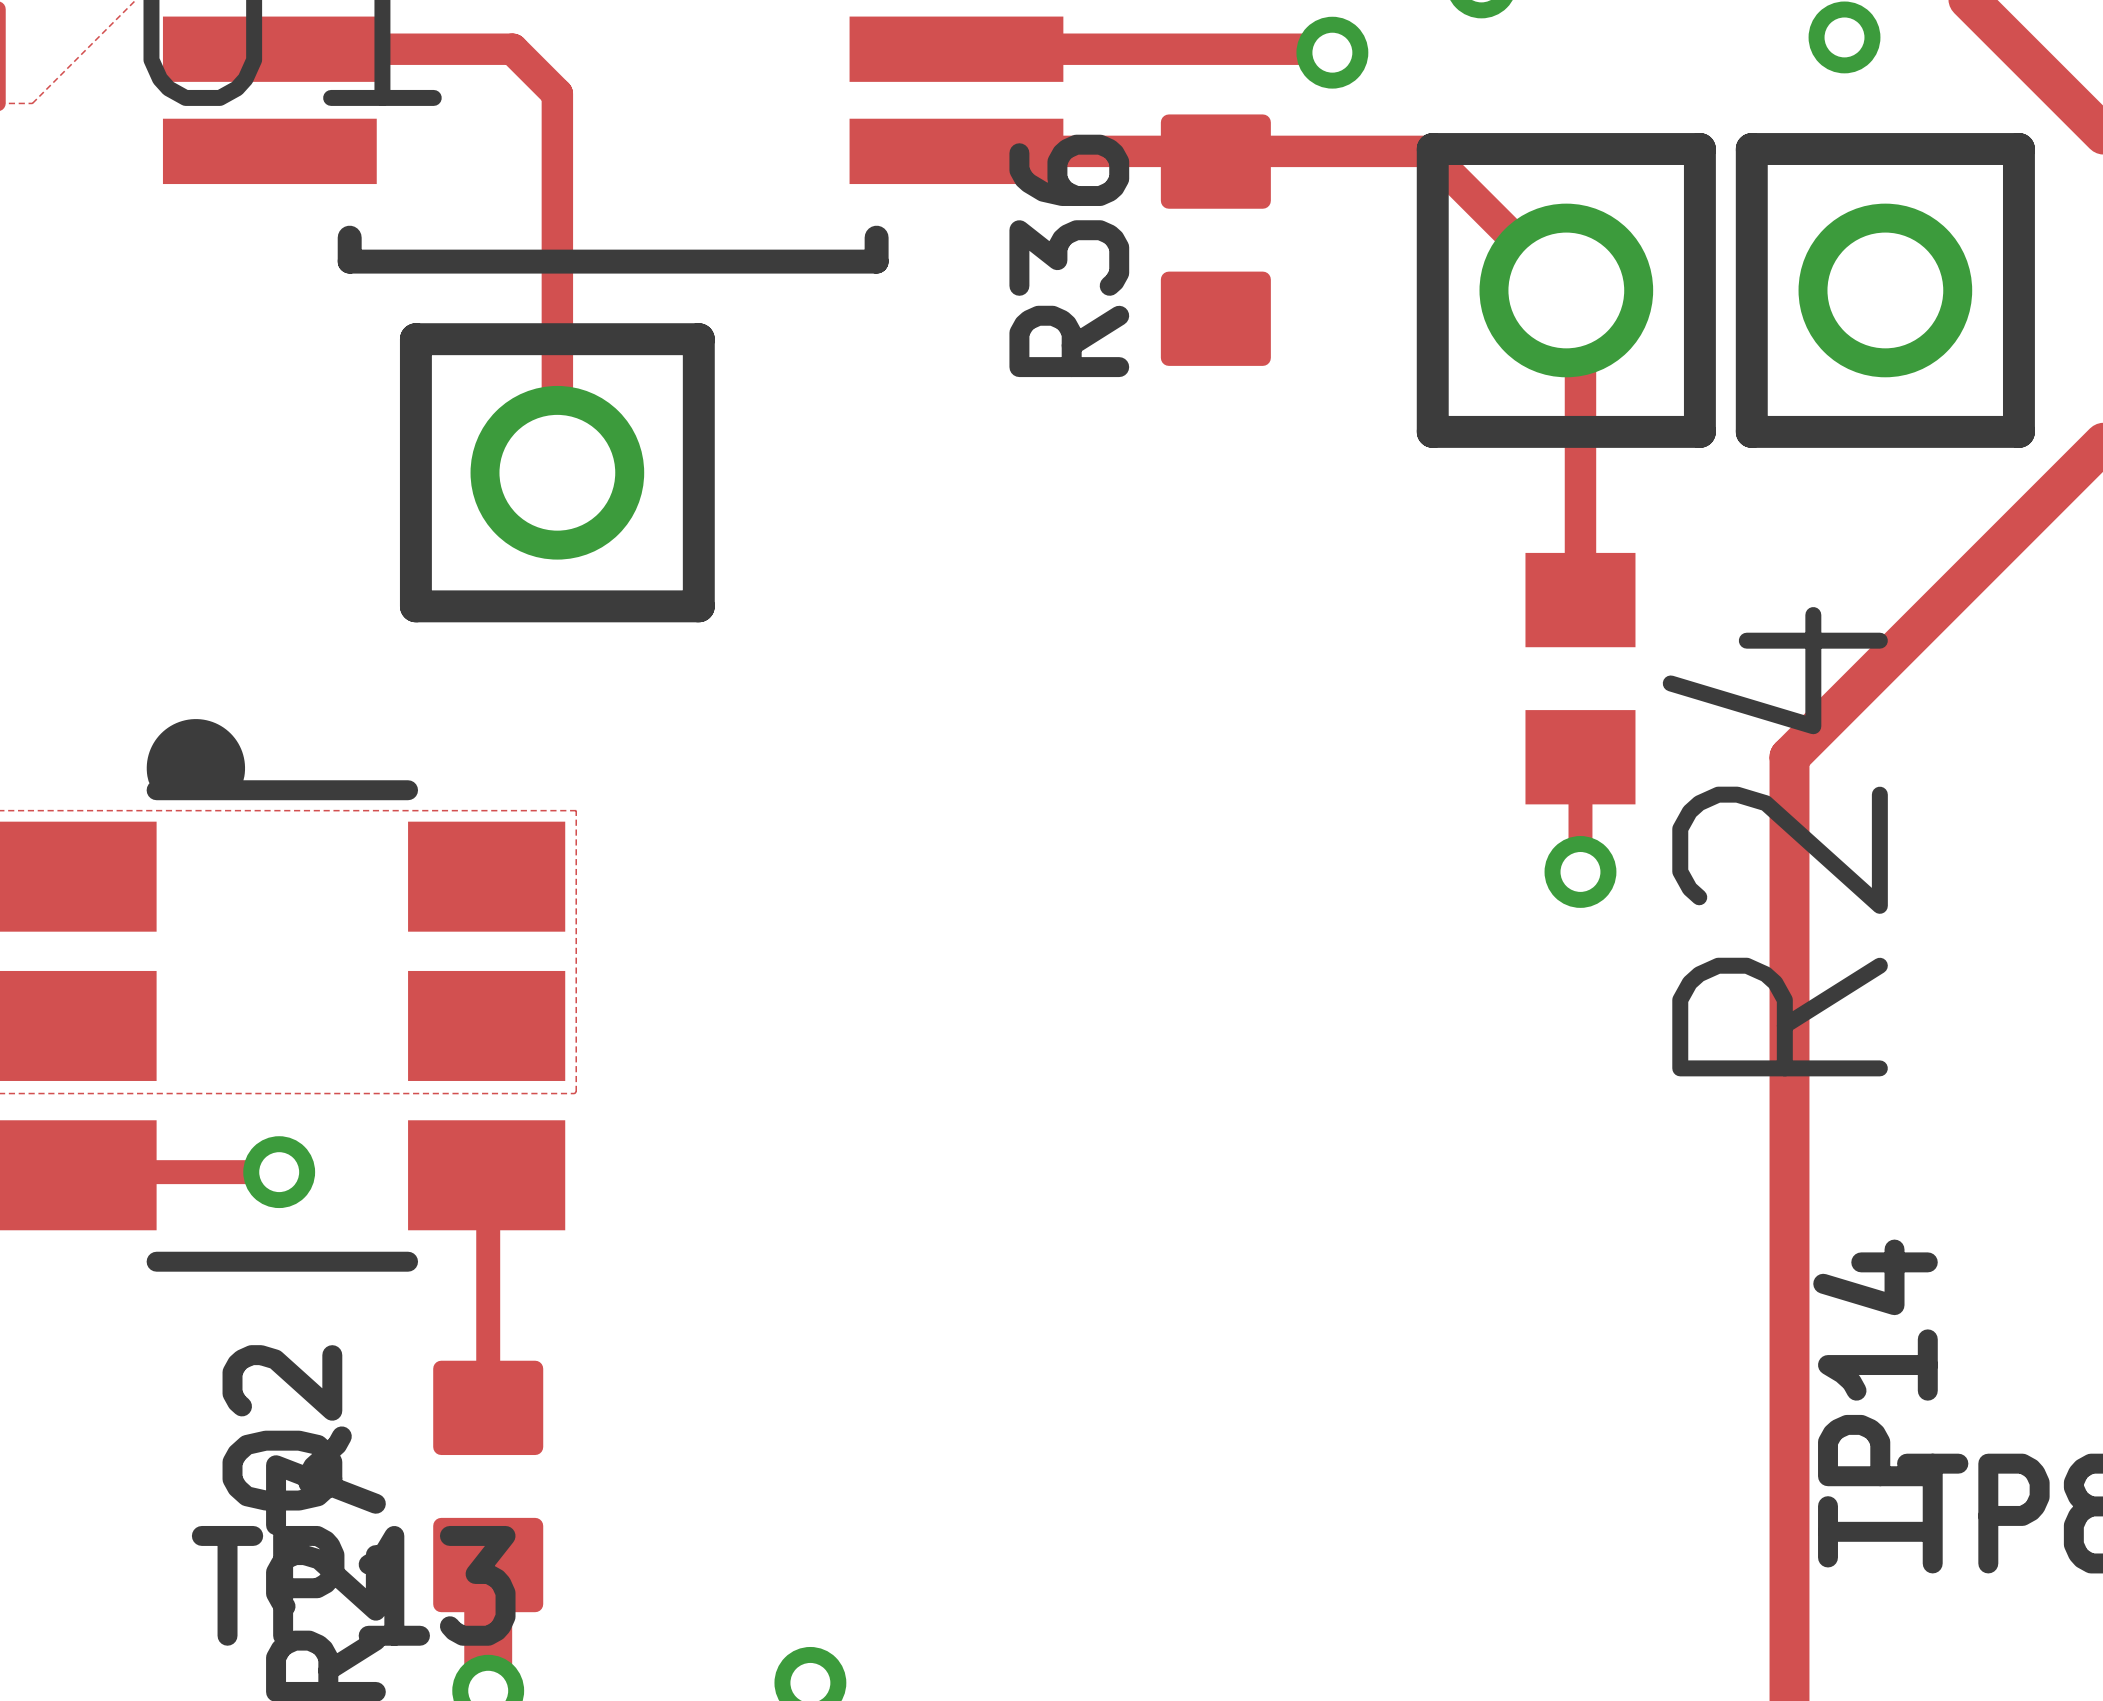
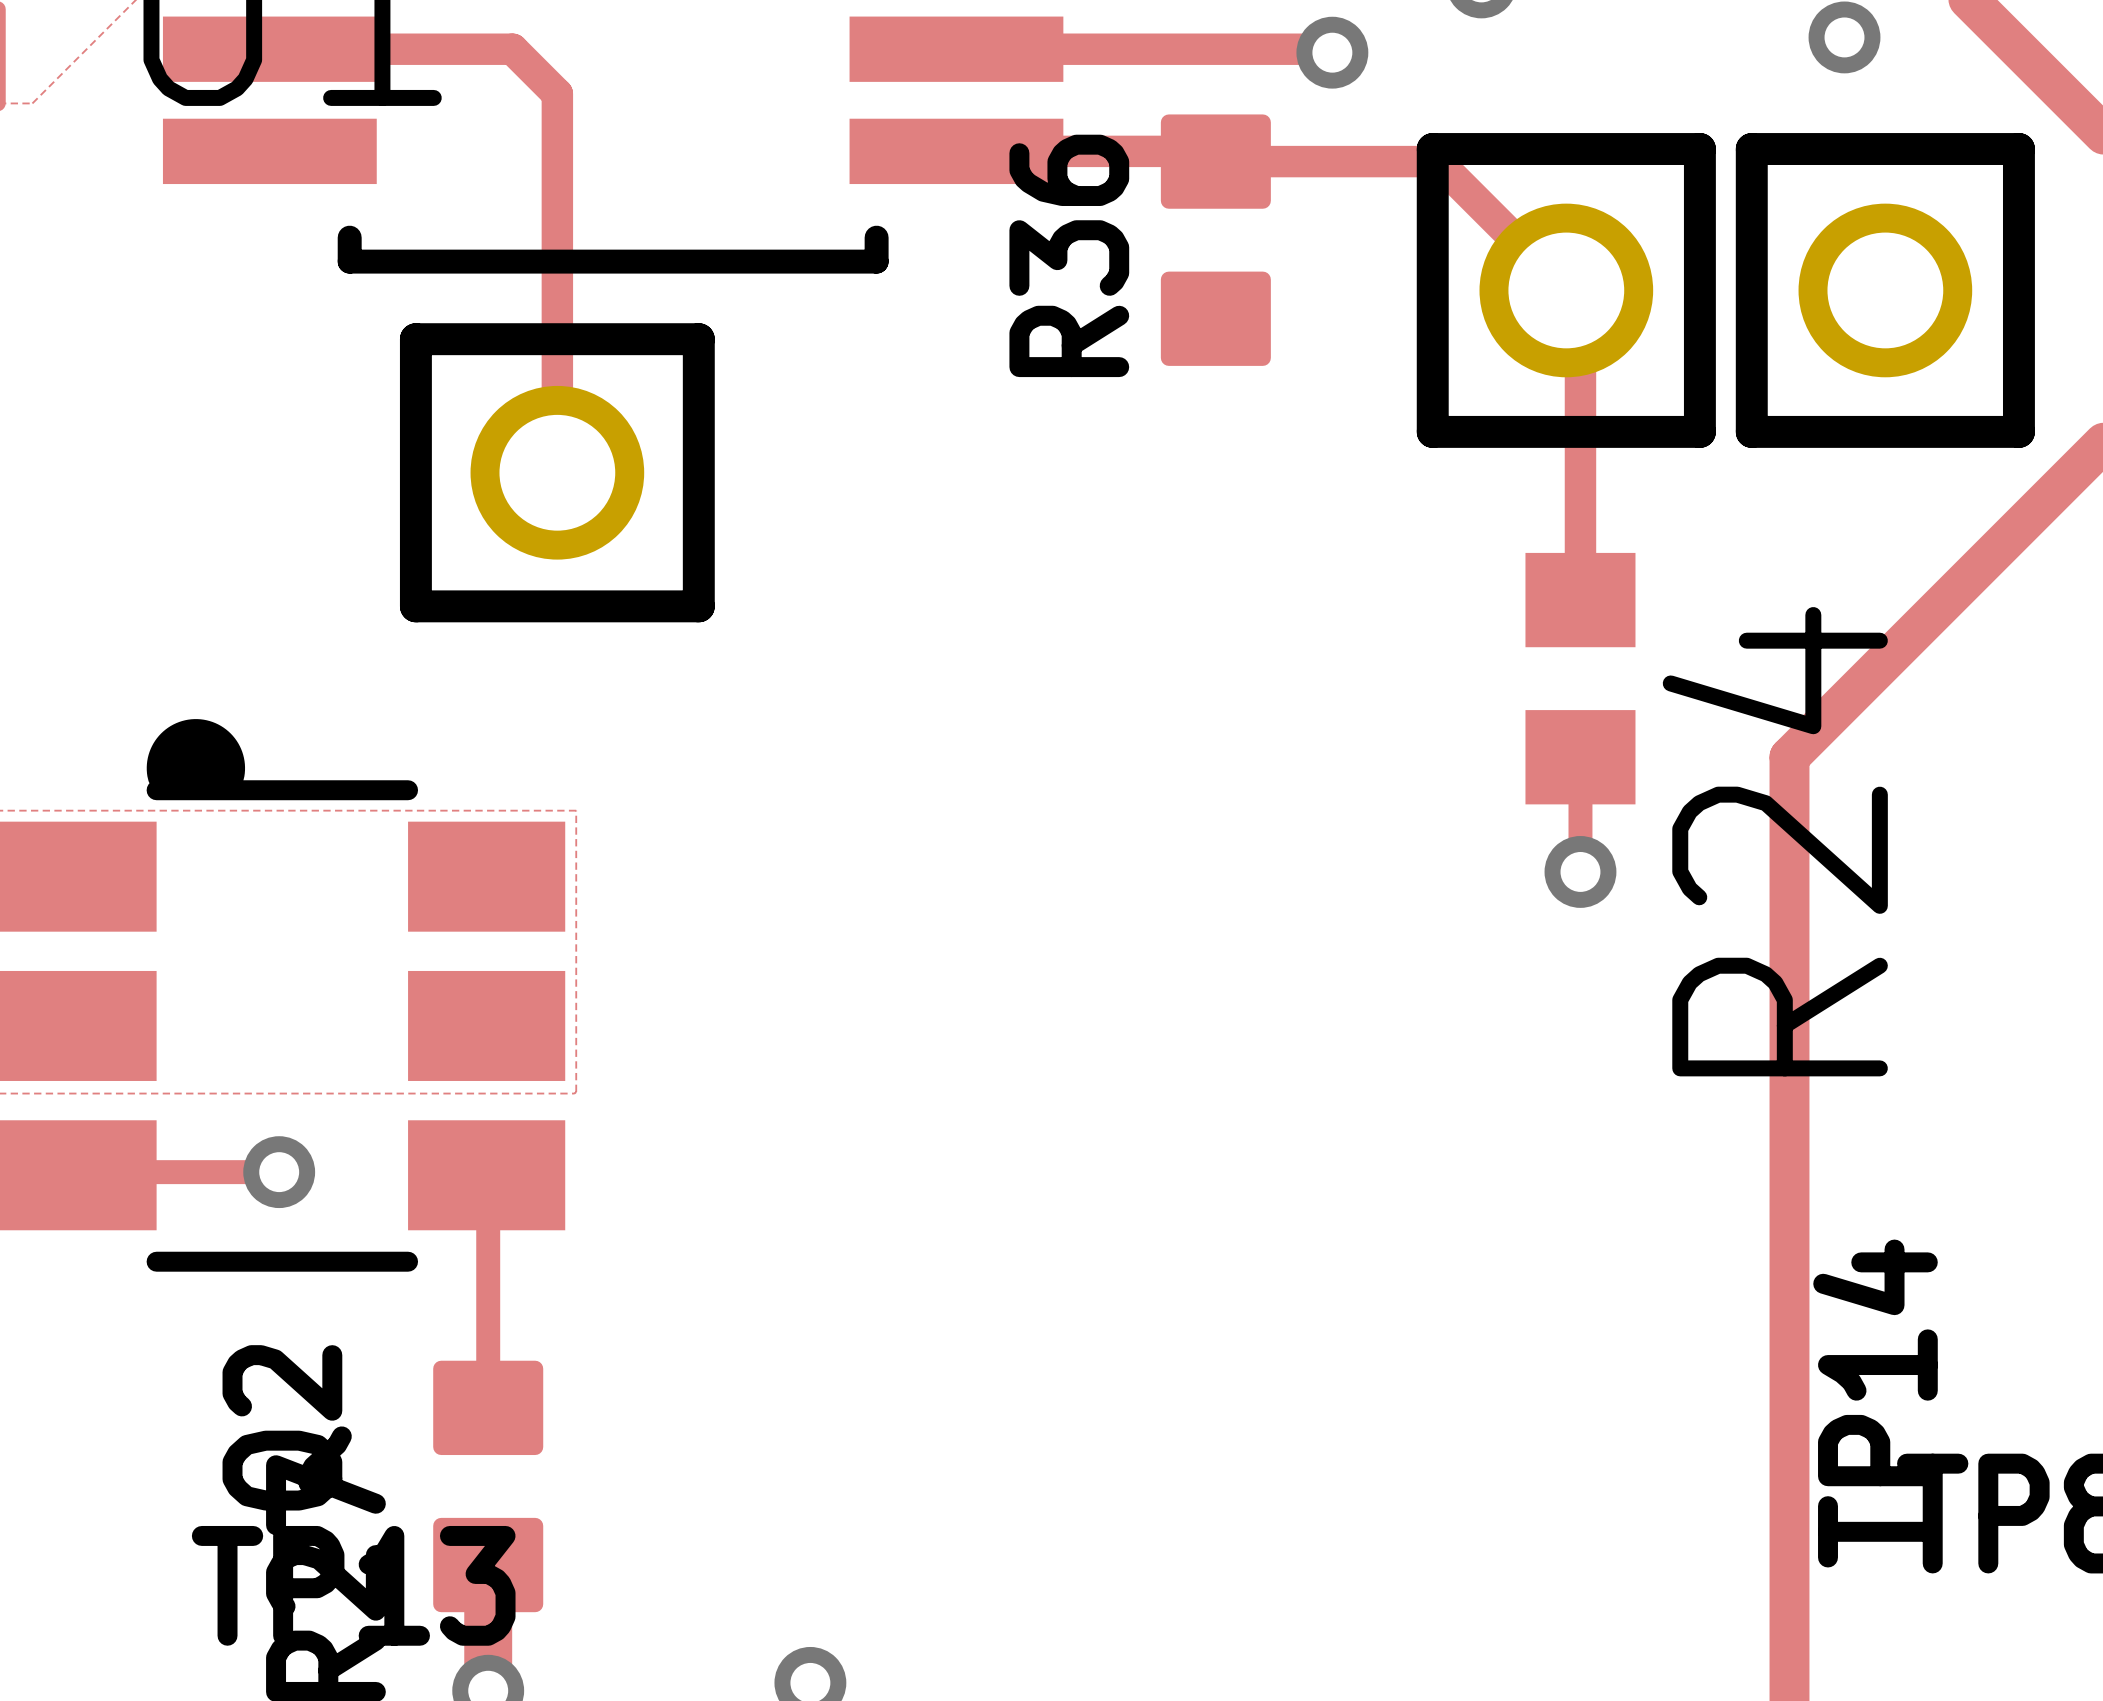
track: (1205, 151) (1427, 151) (1437, 161) -> (1215, 161) (1437, 161)

